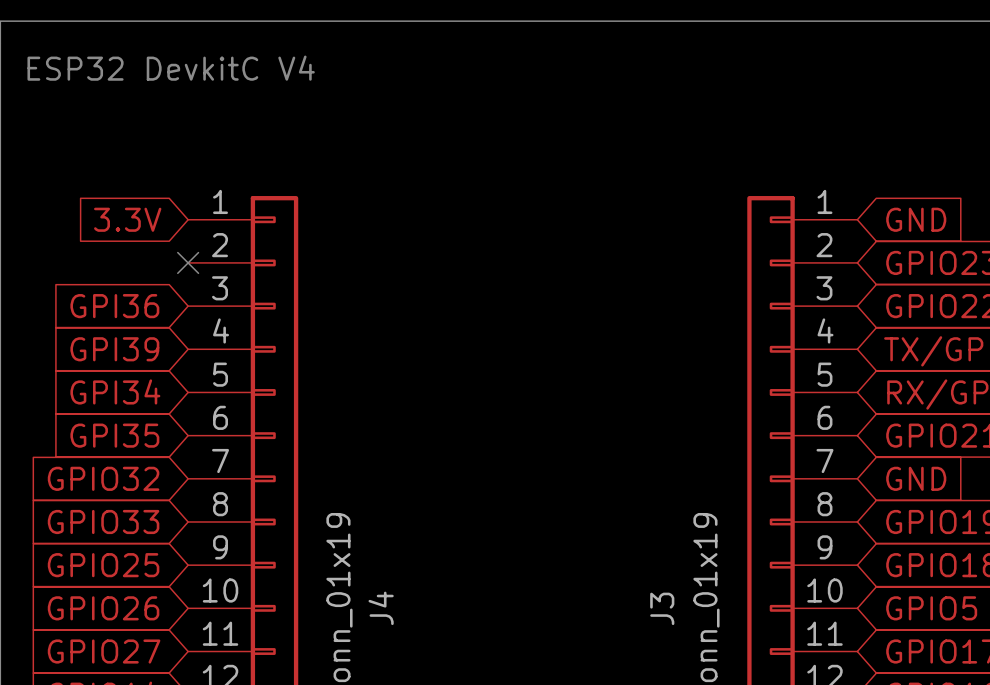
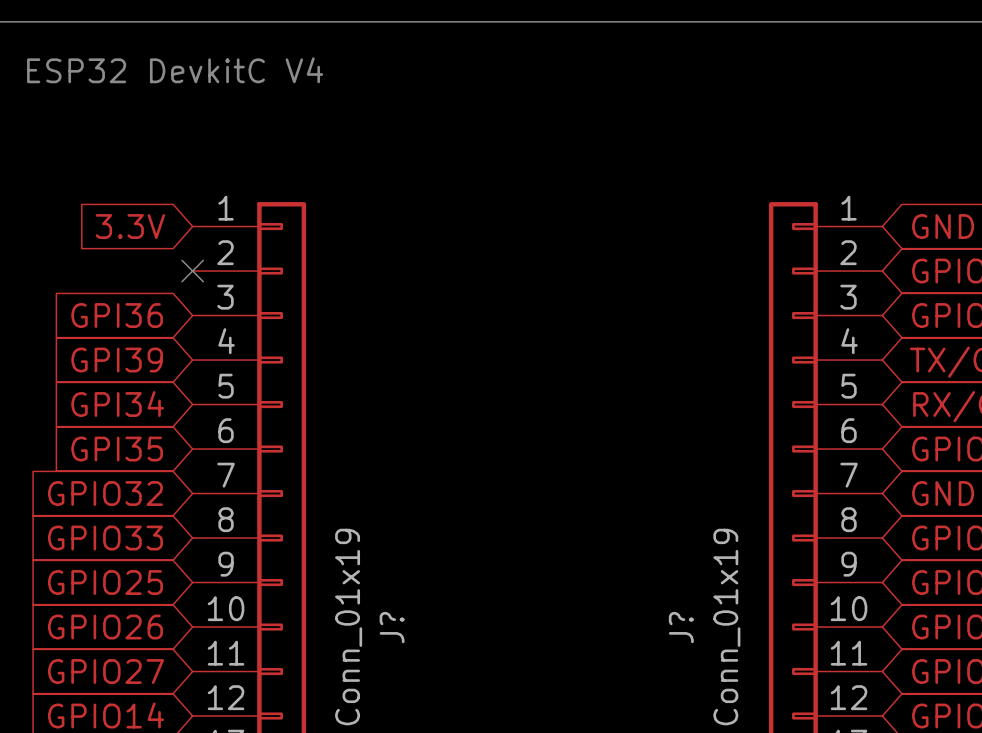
J4 name: J4 (381, 608) -> J? (392, 627)
J3 name: J3 (662, 608) -> J? (681, 627)

